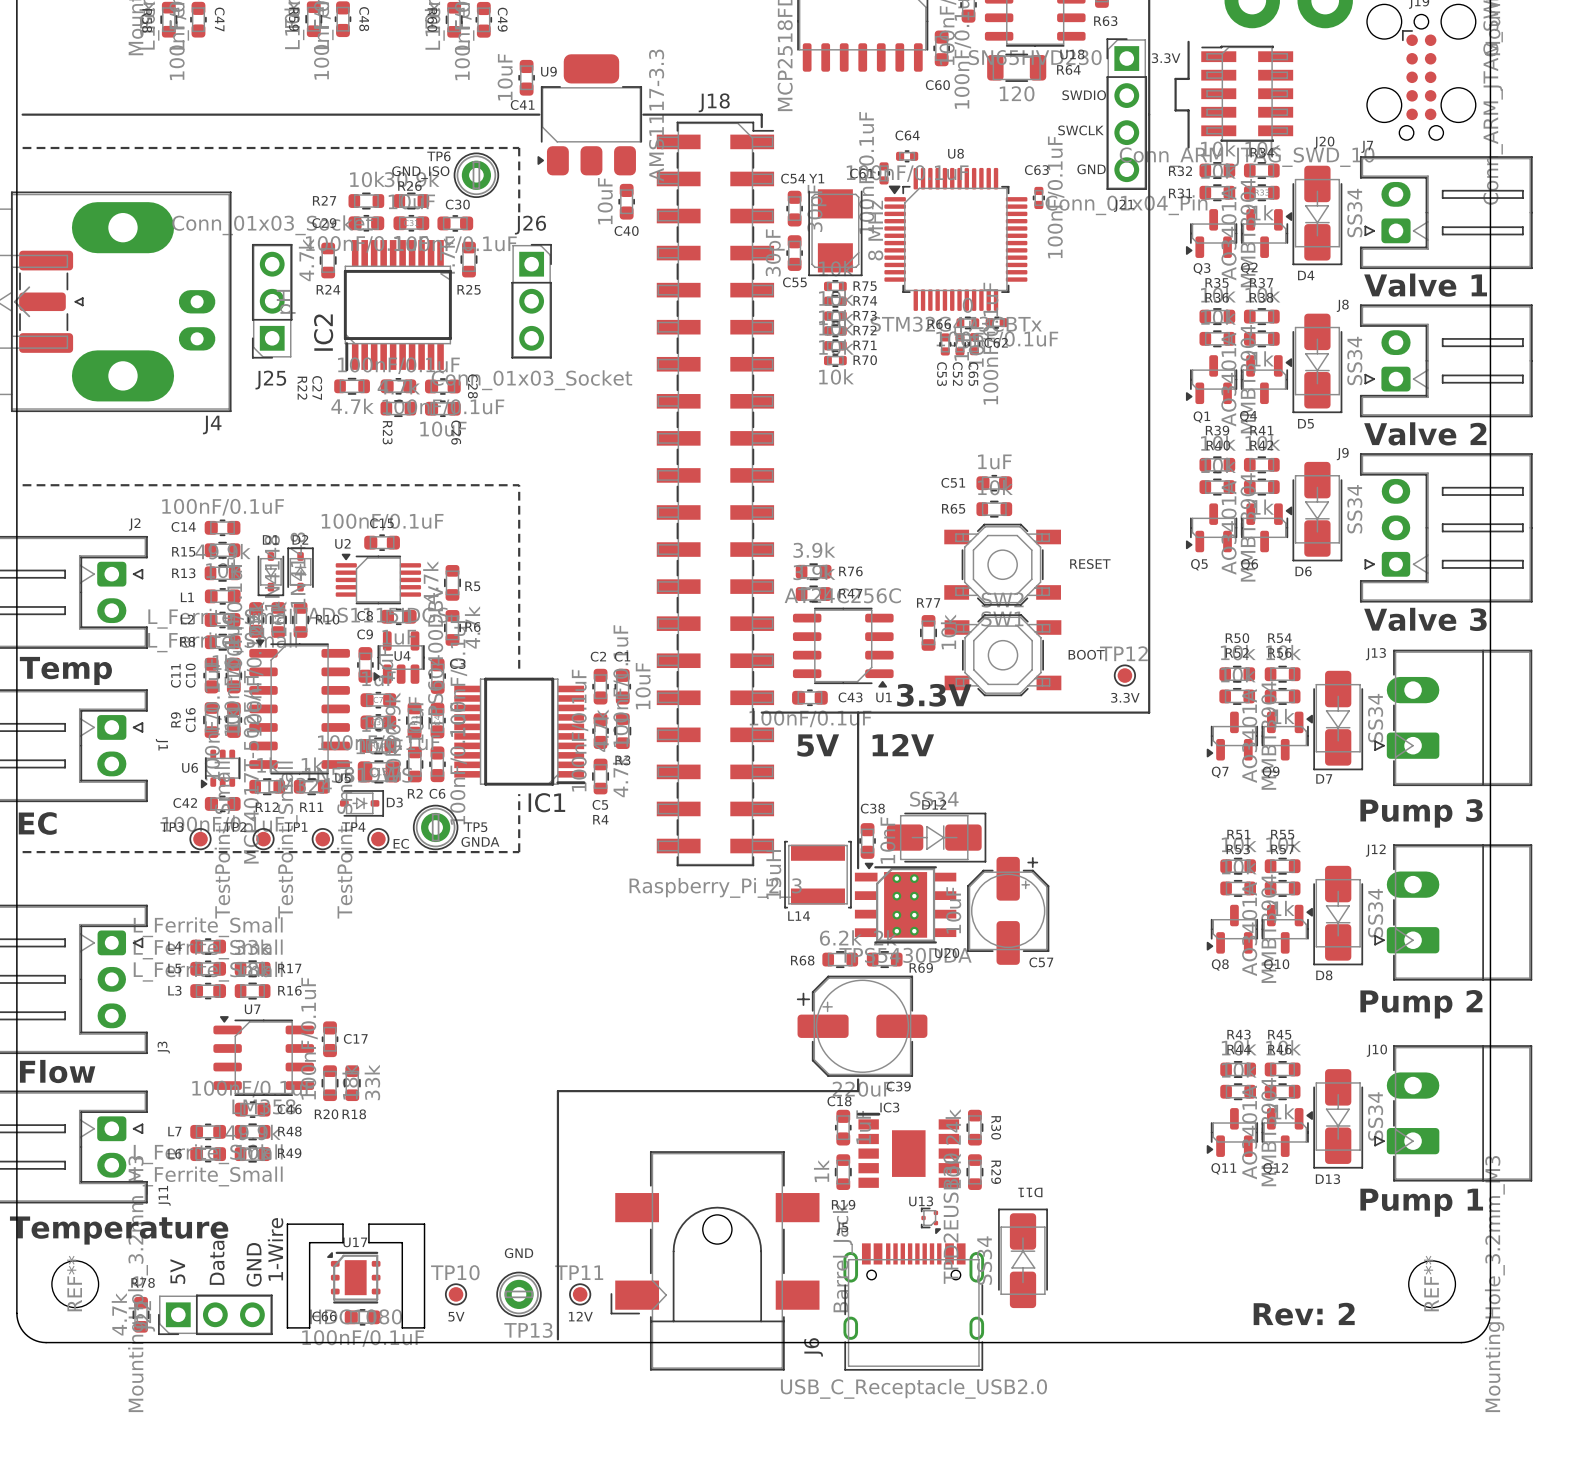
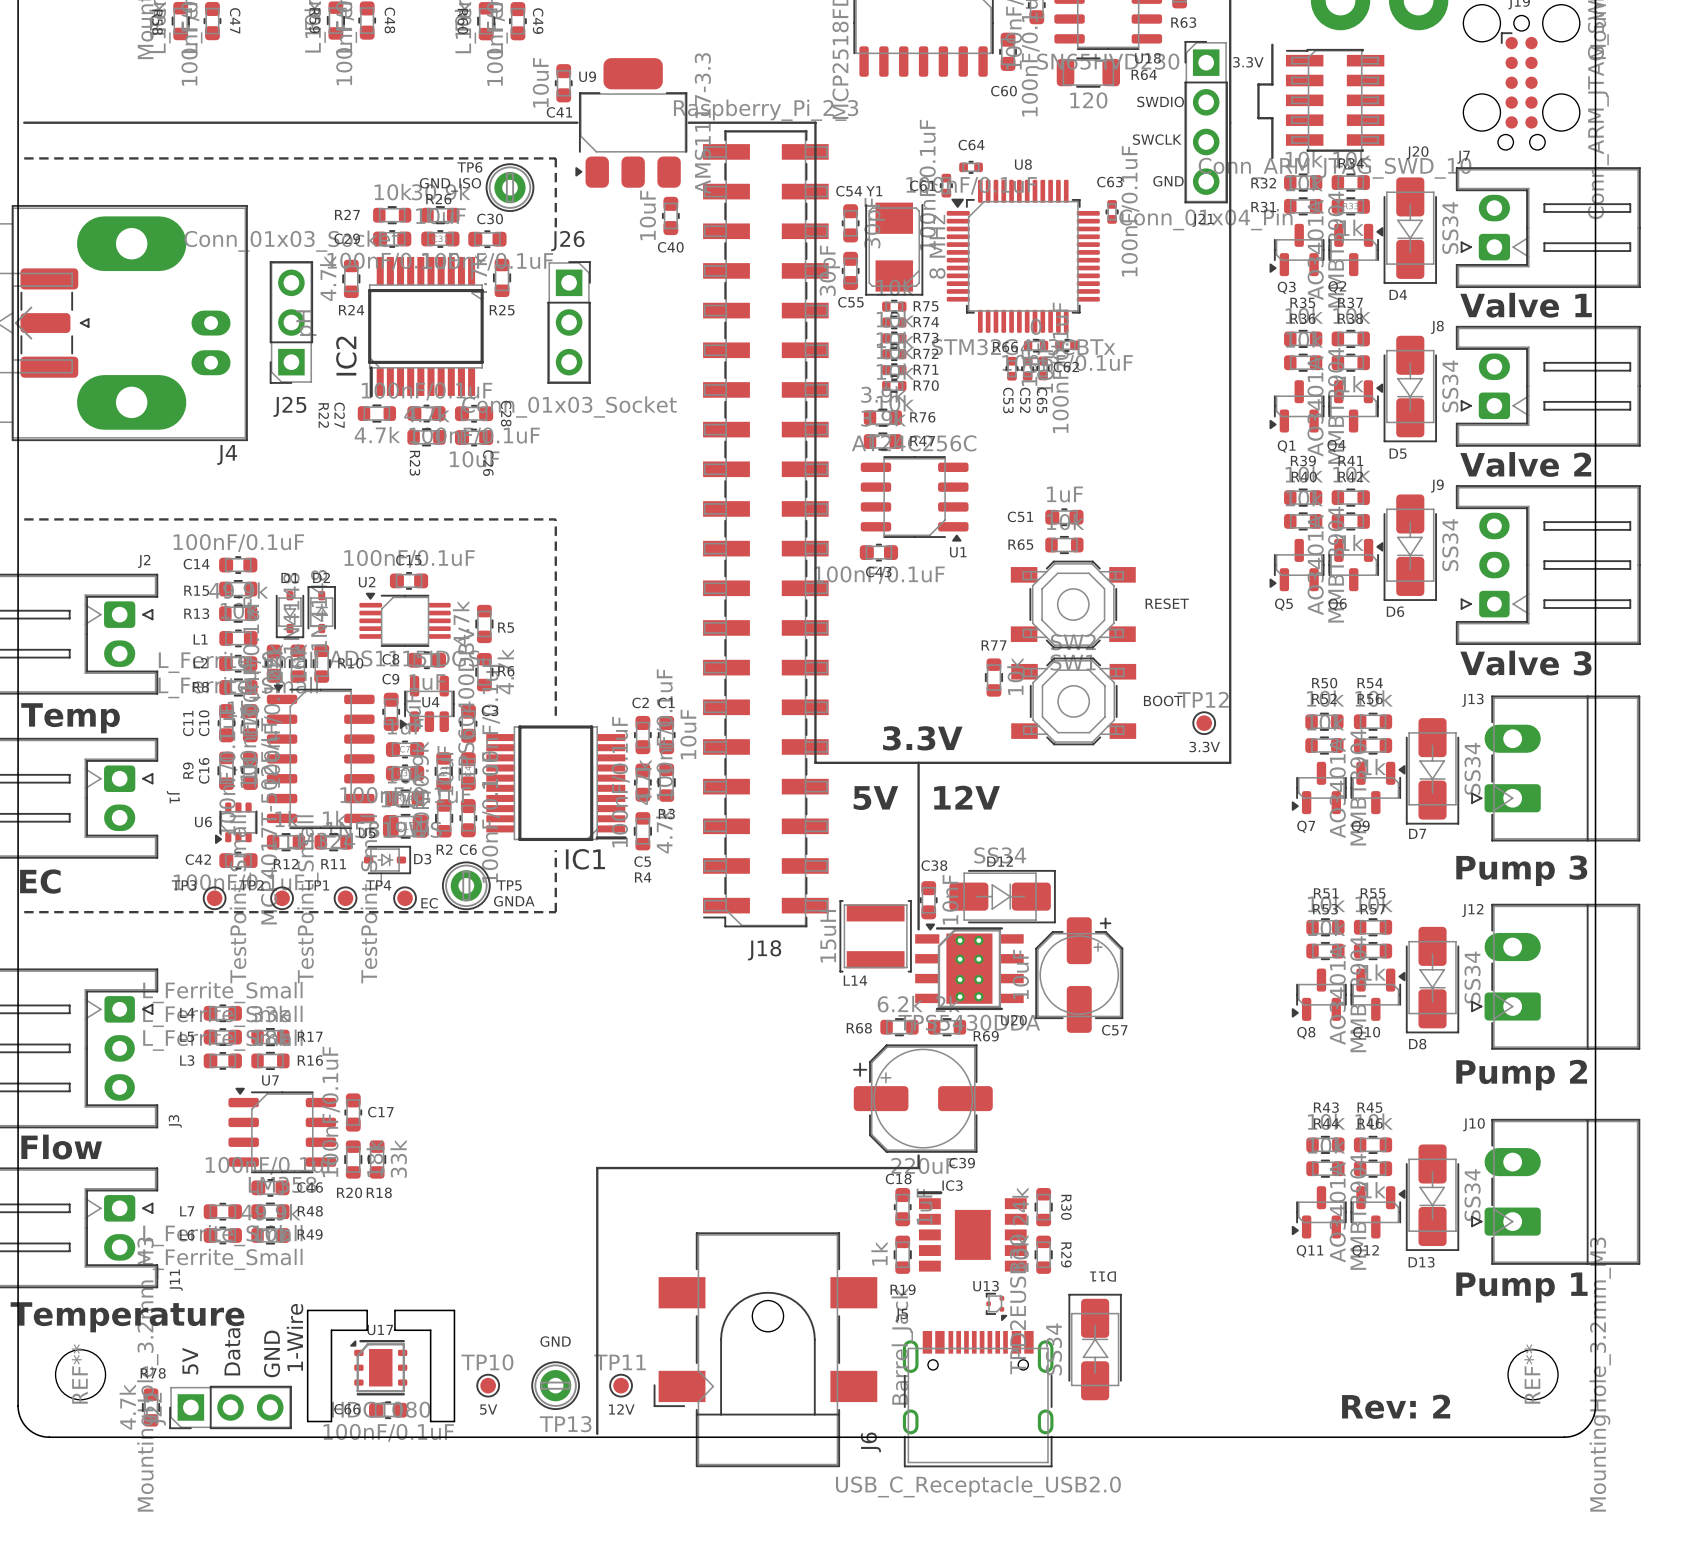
line: none -> (815, 136) (815, 762)
J18 rotation: 0° (715, 493) -> 180° (765, 528)
R76 position: (813, 571) -> (882, 417)
R47 position: (813, 594) -> (882, 441)
U1 position: (843, 647) -> (914, 498)
text position: 3.3V (934, 695) -> 3.3V (922, 738)
C43 position: (809, 697) -> (878, 552)
C43 name position: C43 (850, 697) -> C43 (878, 572)

